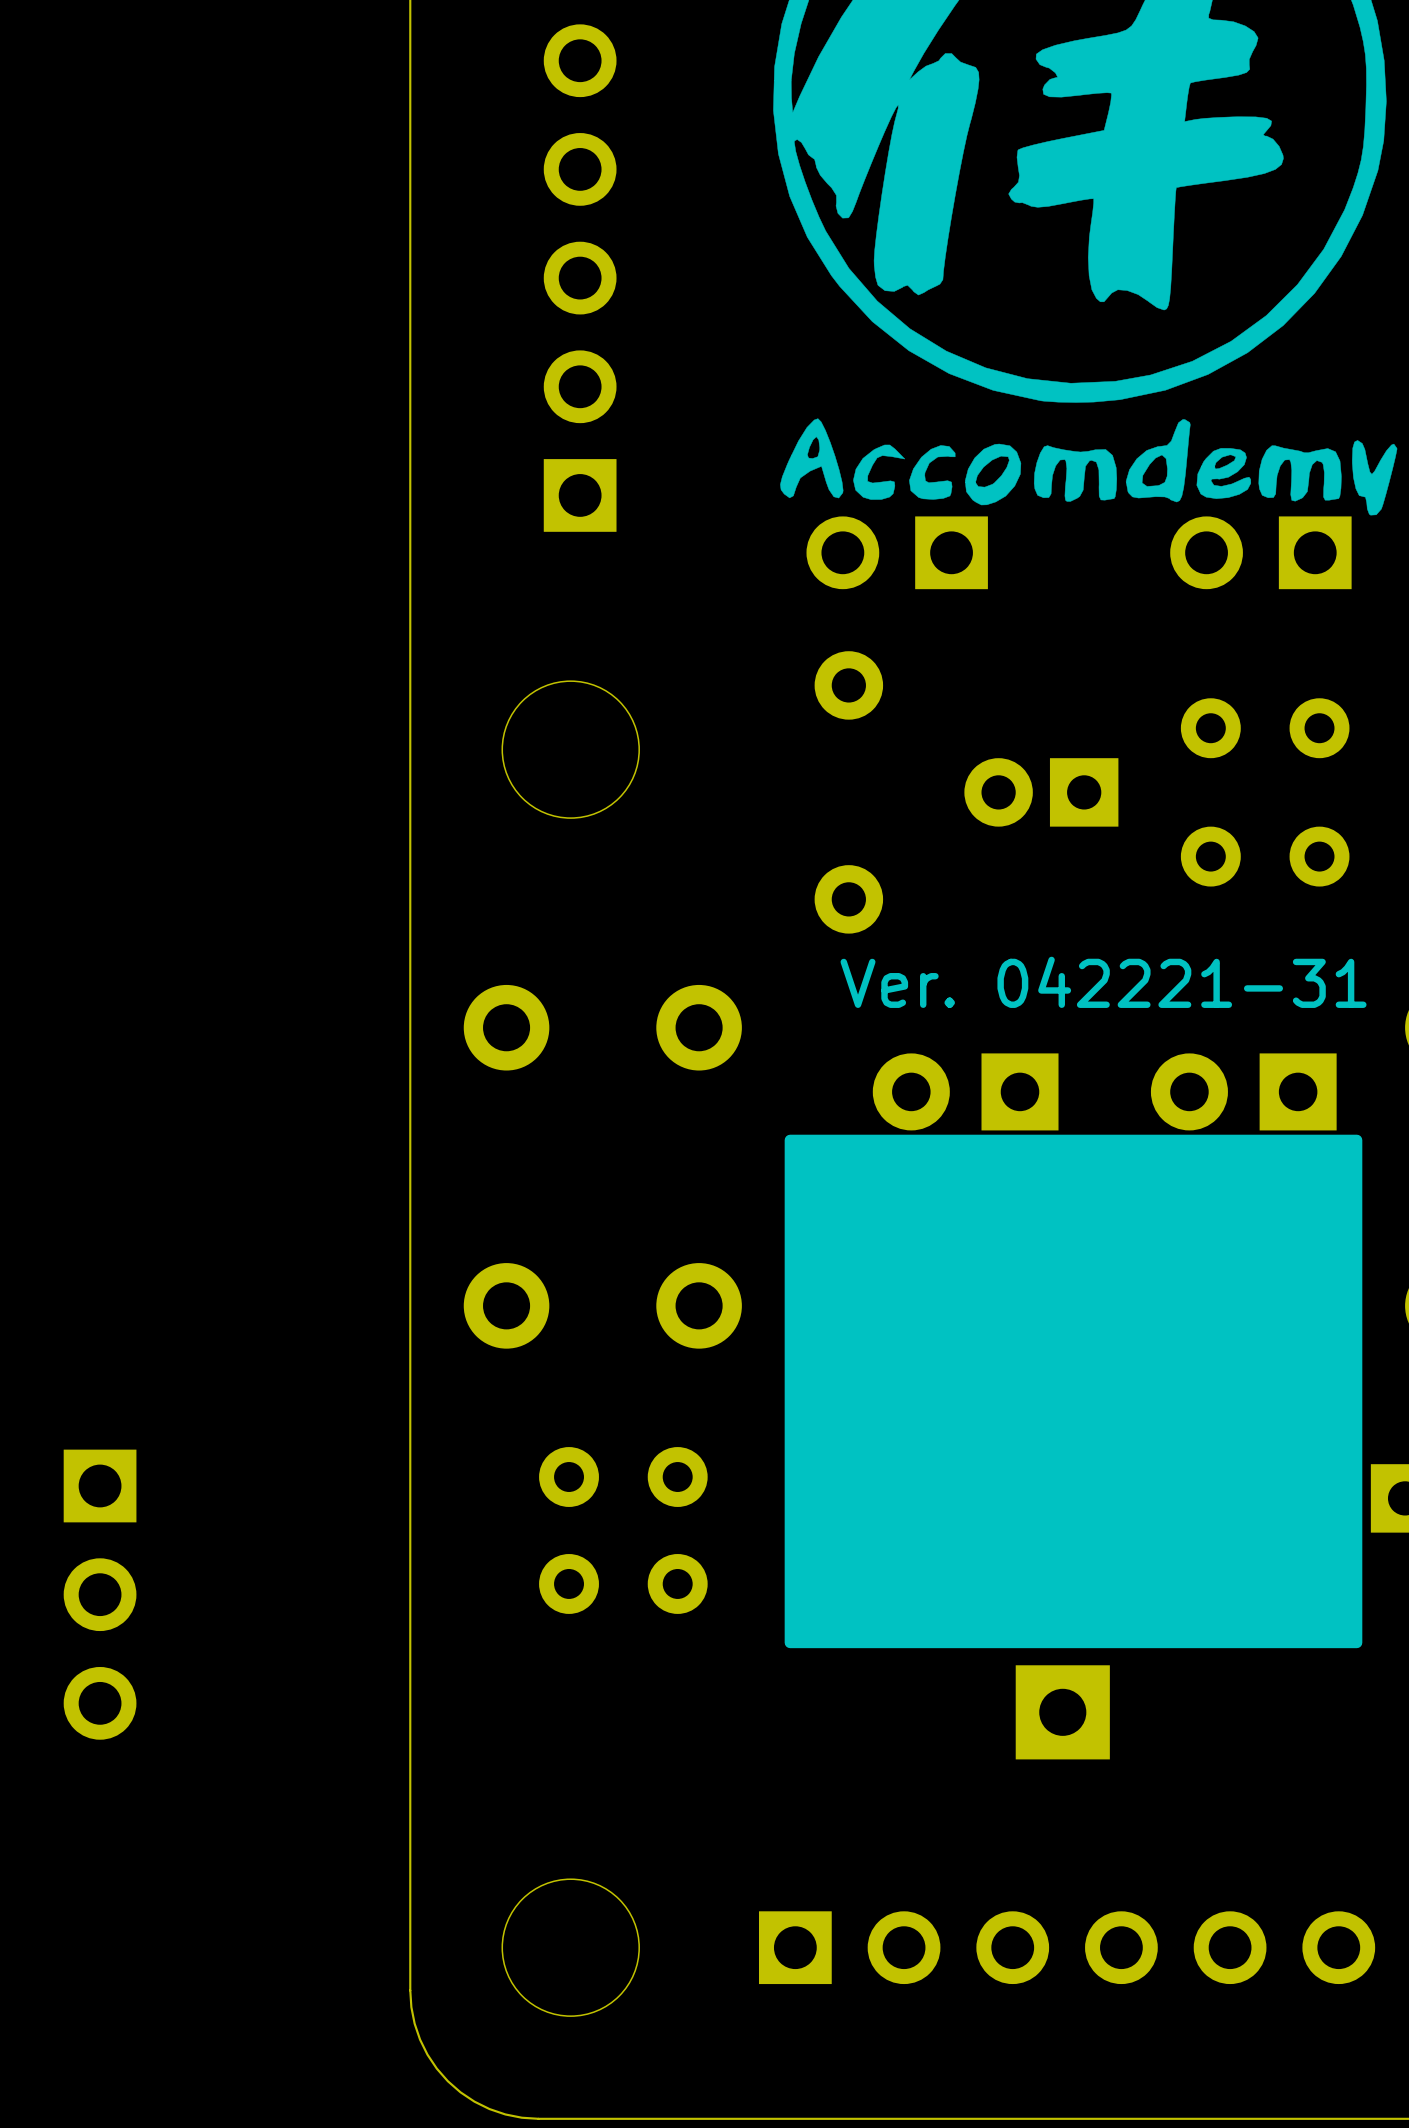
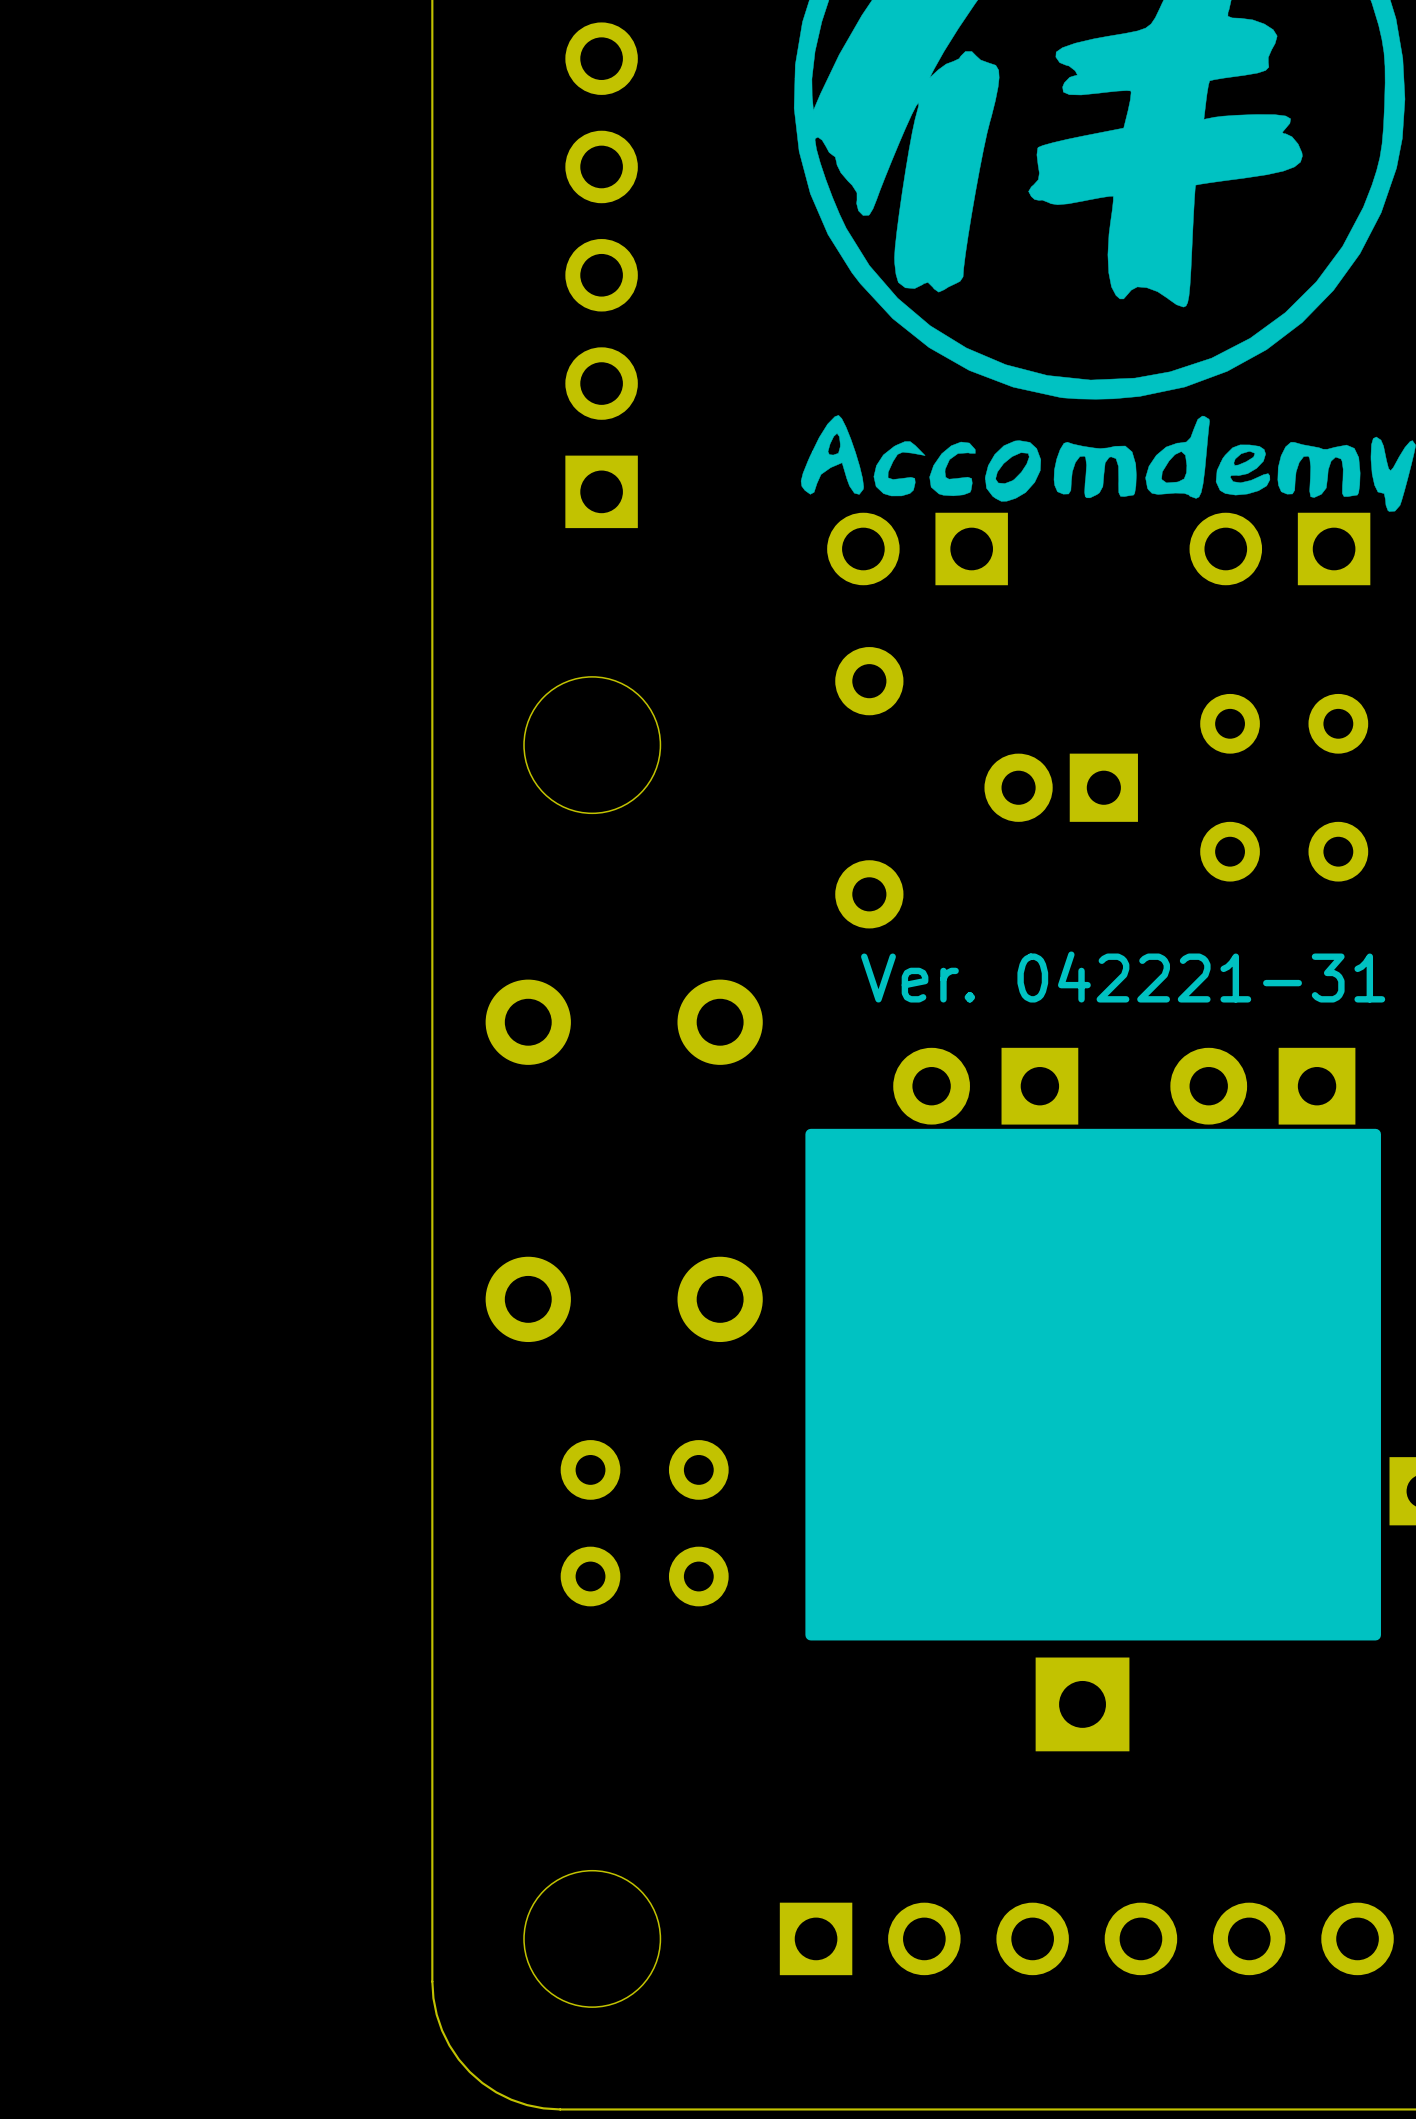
part: (100, 1594) -> none

